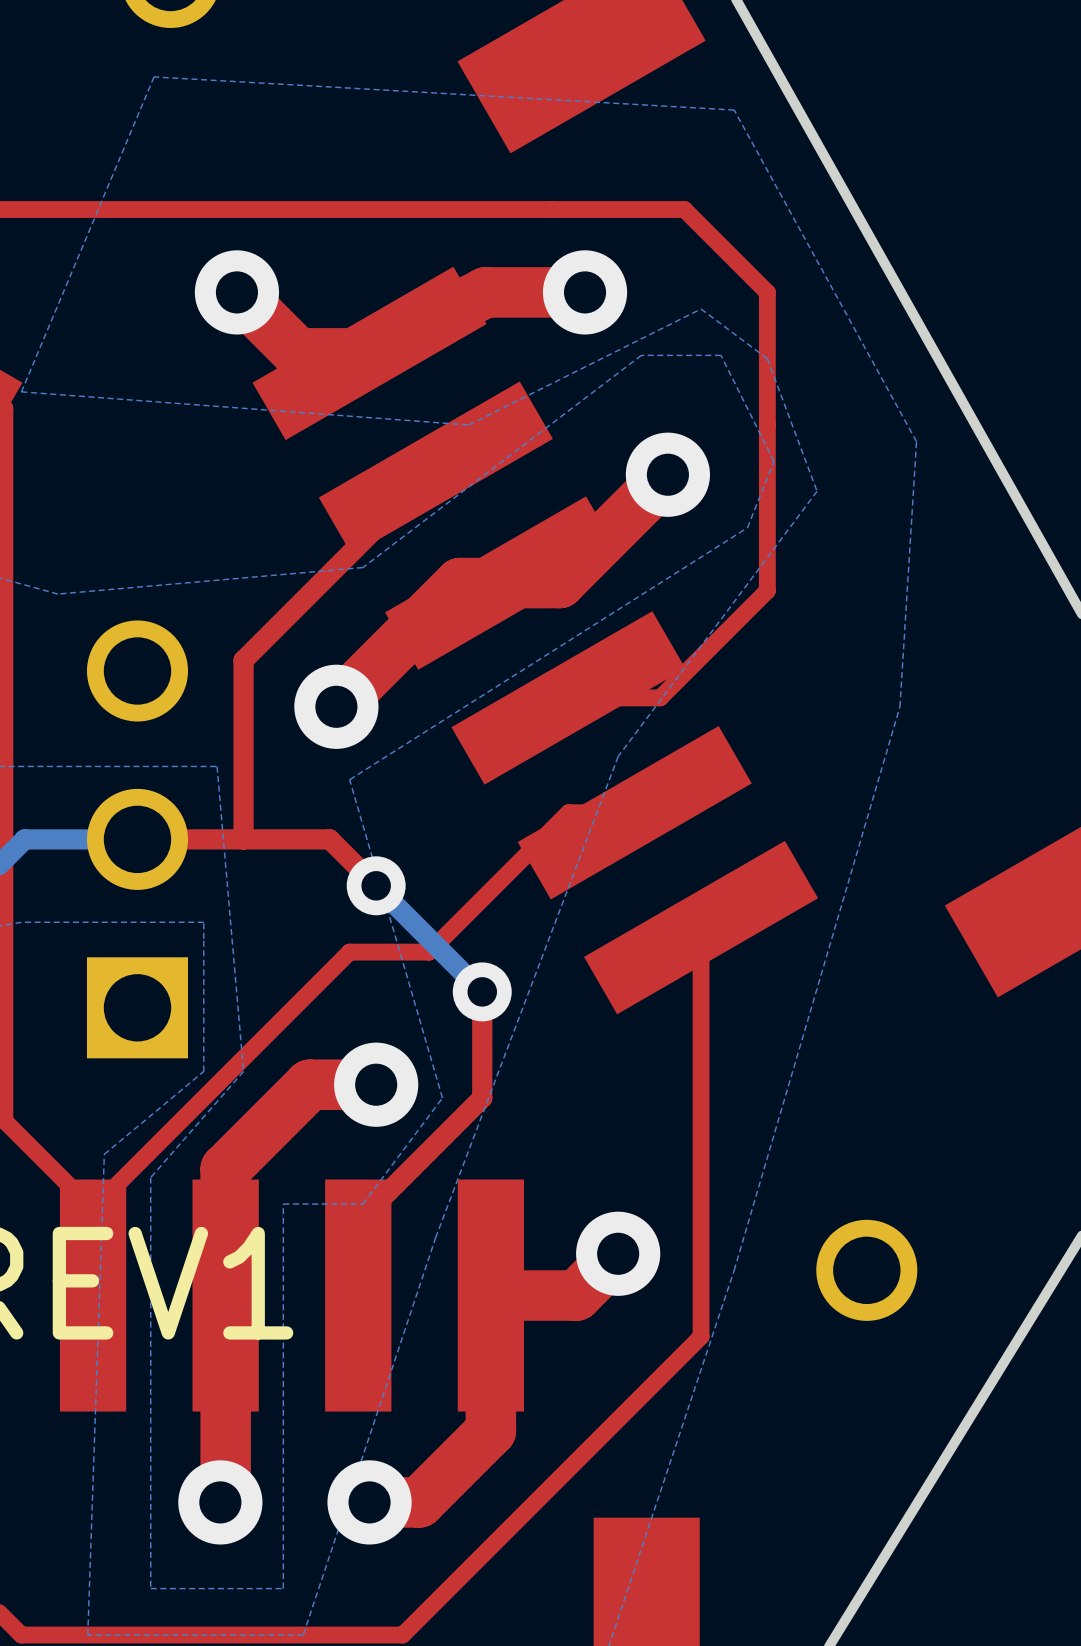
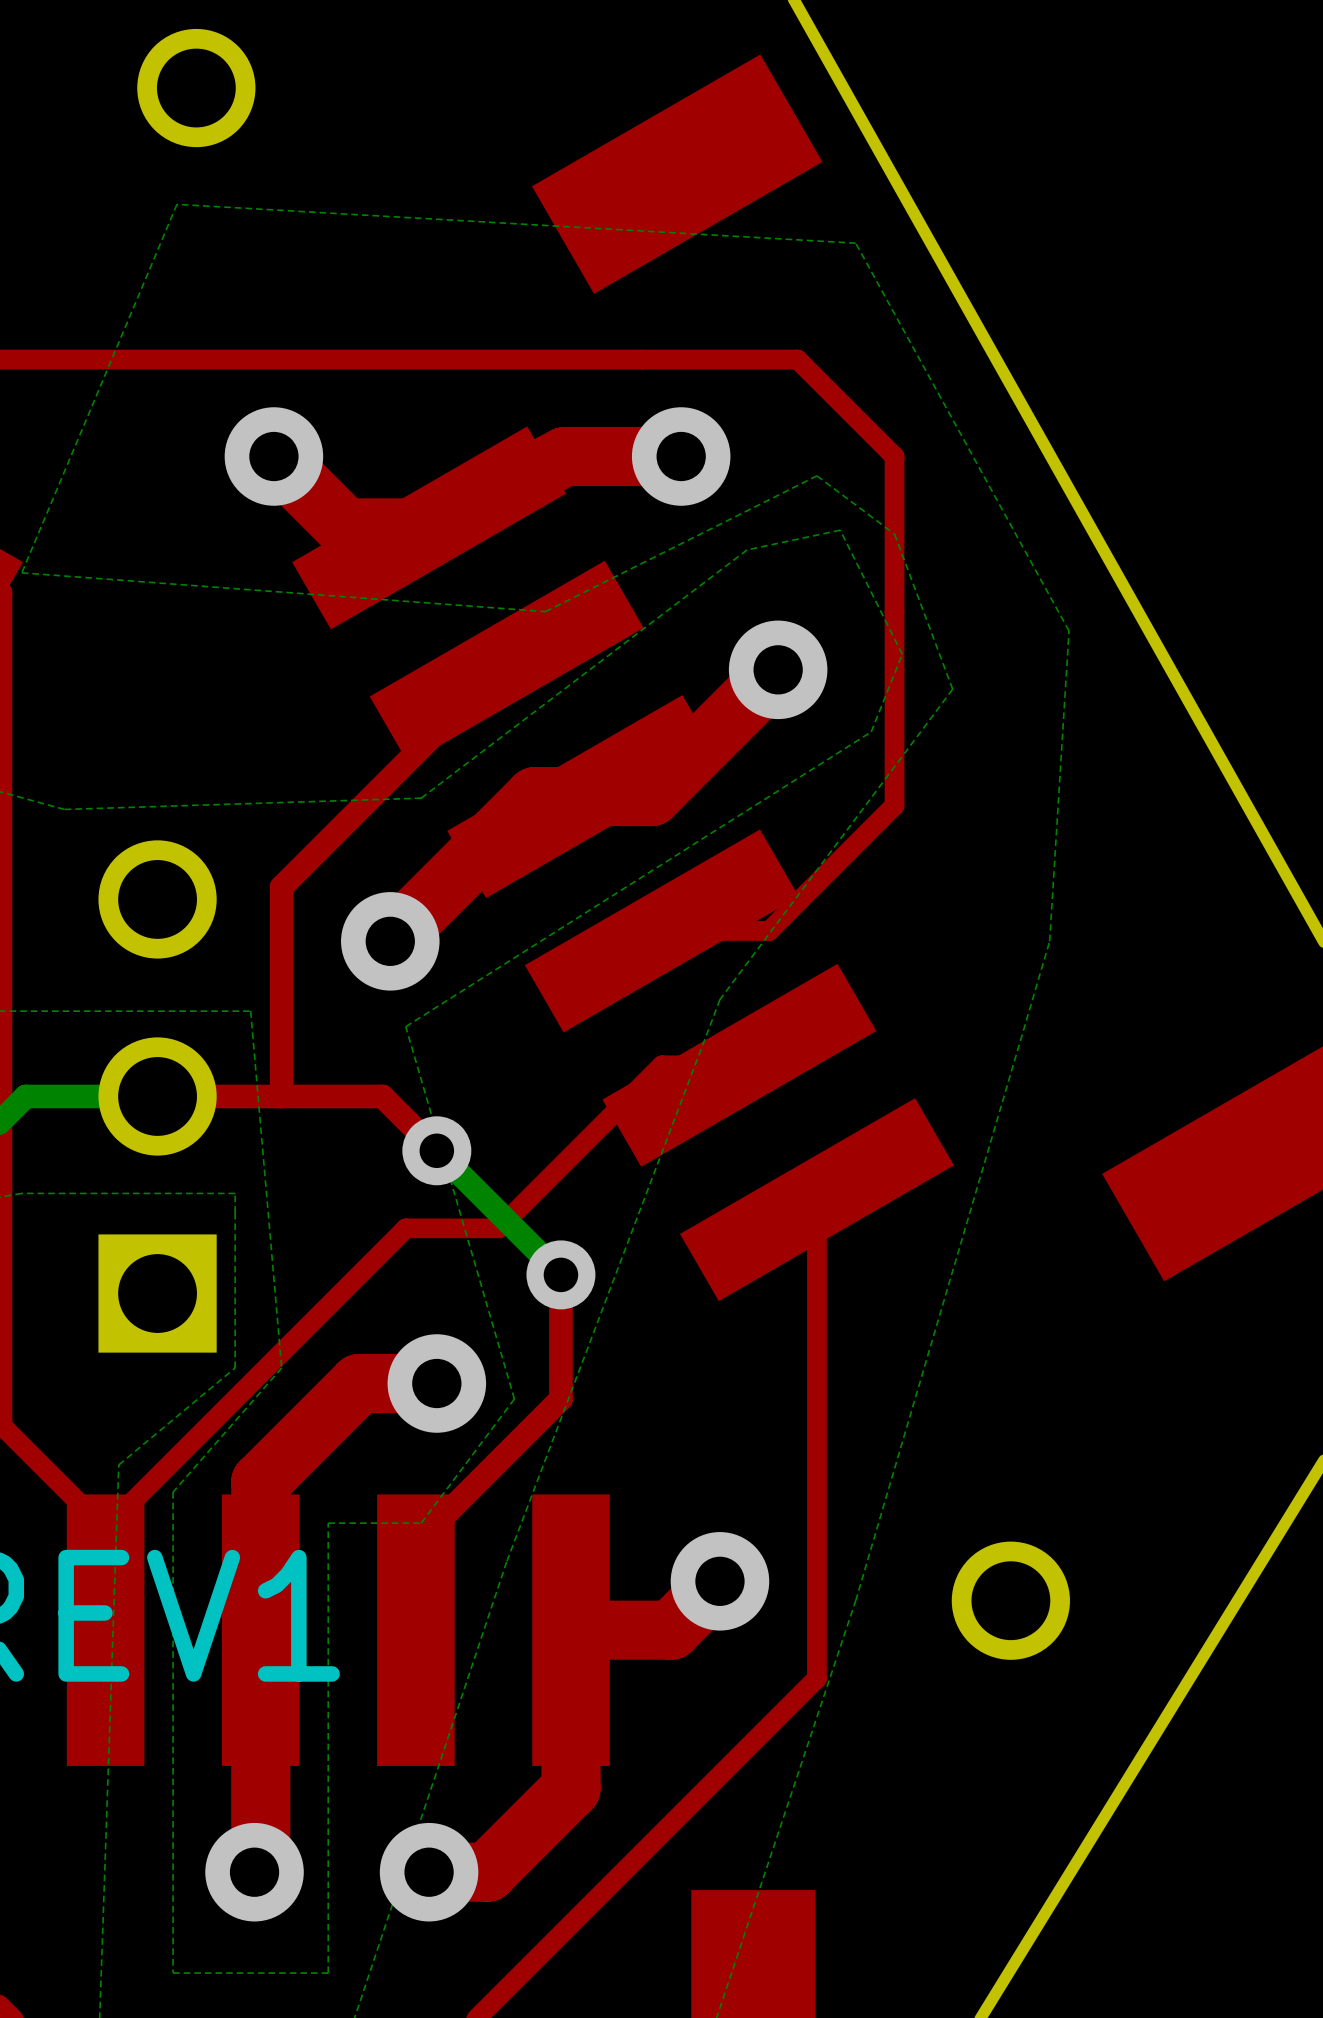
bottom zone outline: (720, 355) (641, 355) (362, 567) (57, 594) -> (840, 530) (747, 549) (421, 798) (64, 809)

